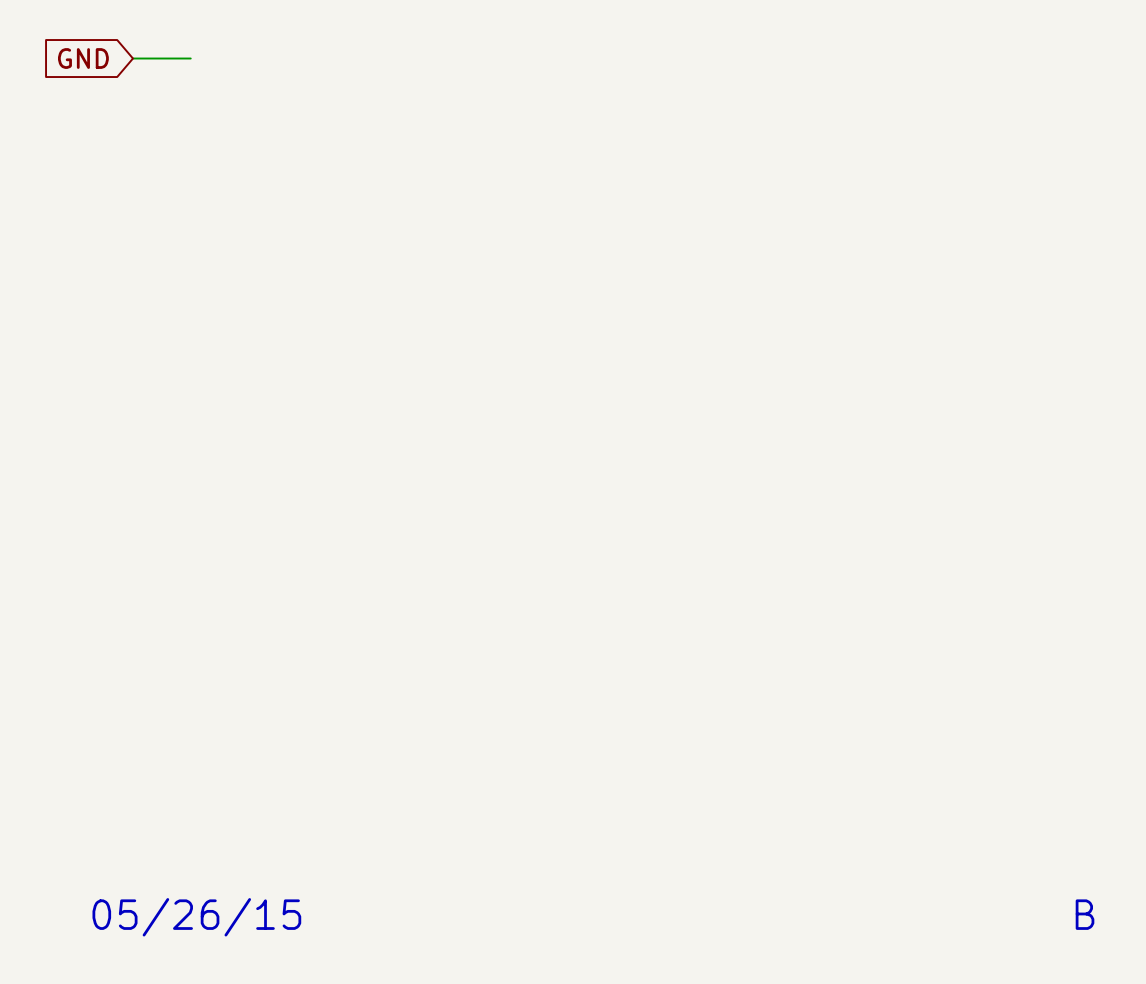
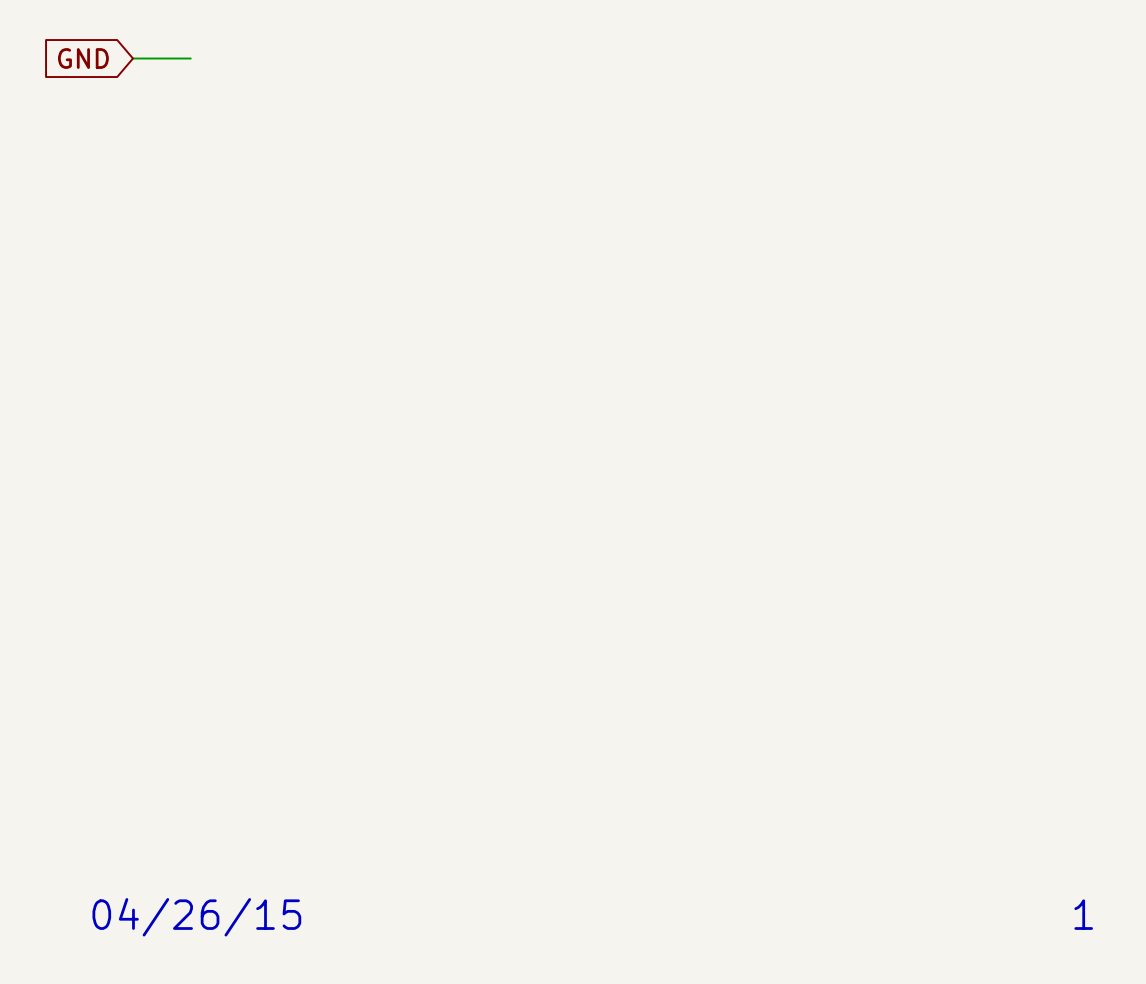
text: B (1085, 914) -> 1 (1083, 914)
text: 05/26/15 (196, 917) -> 04/26/15 (196, 917)

